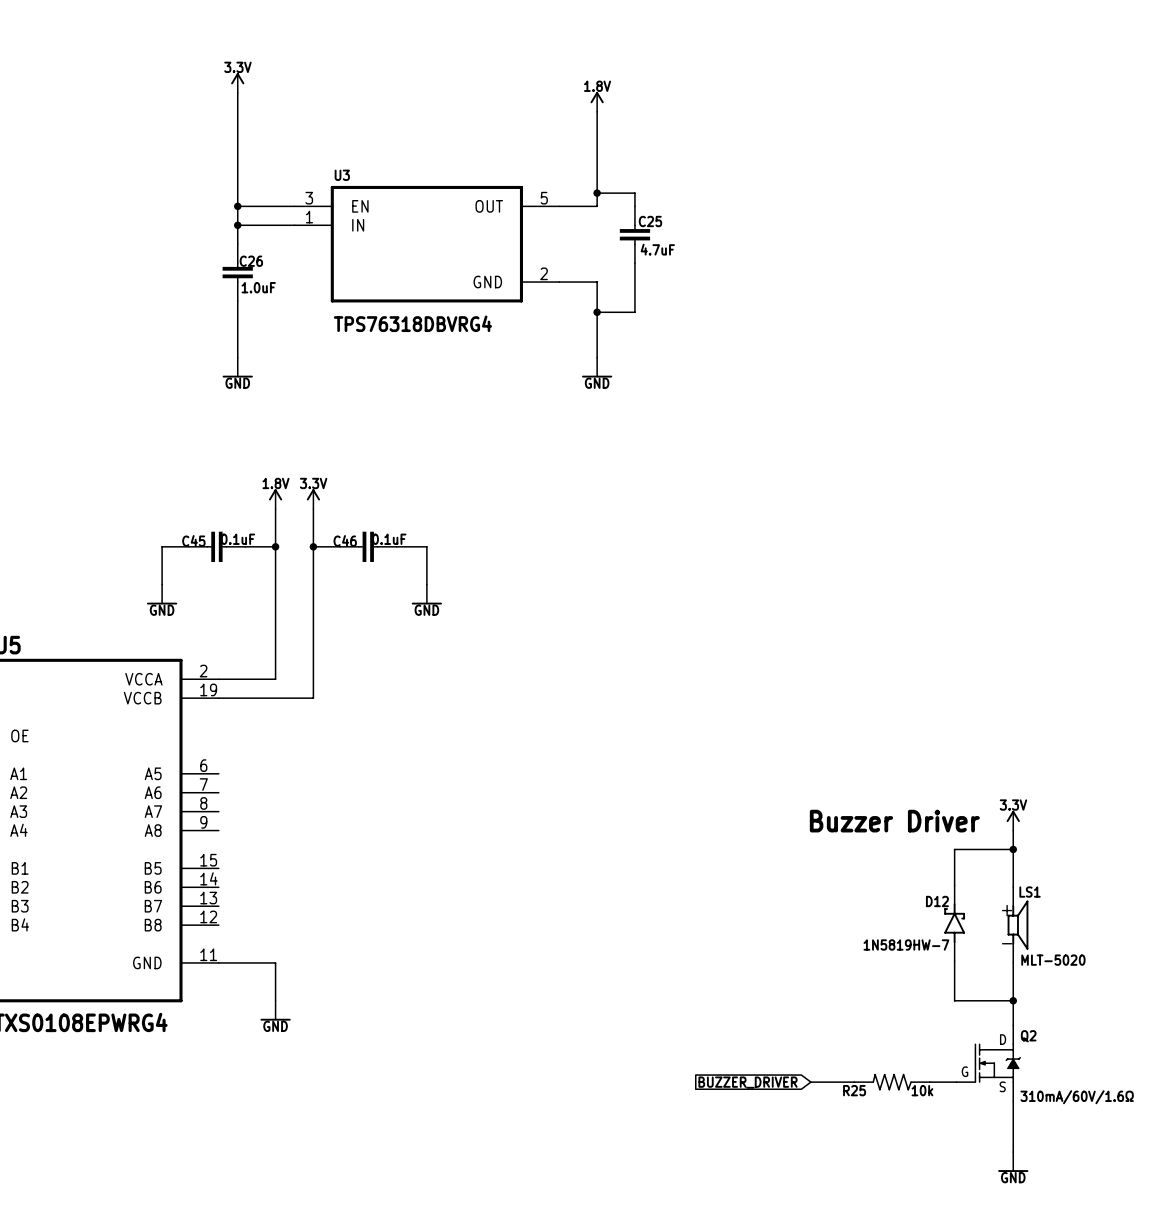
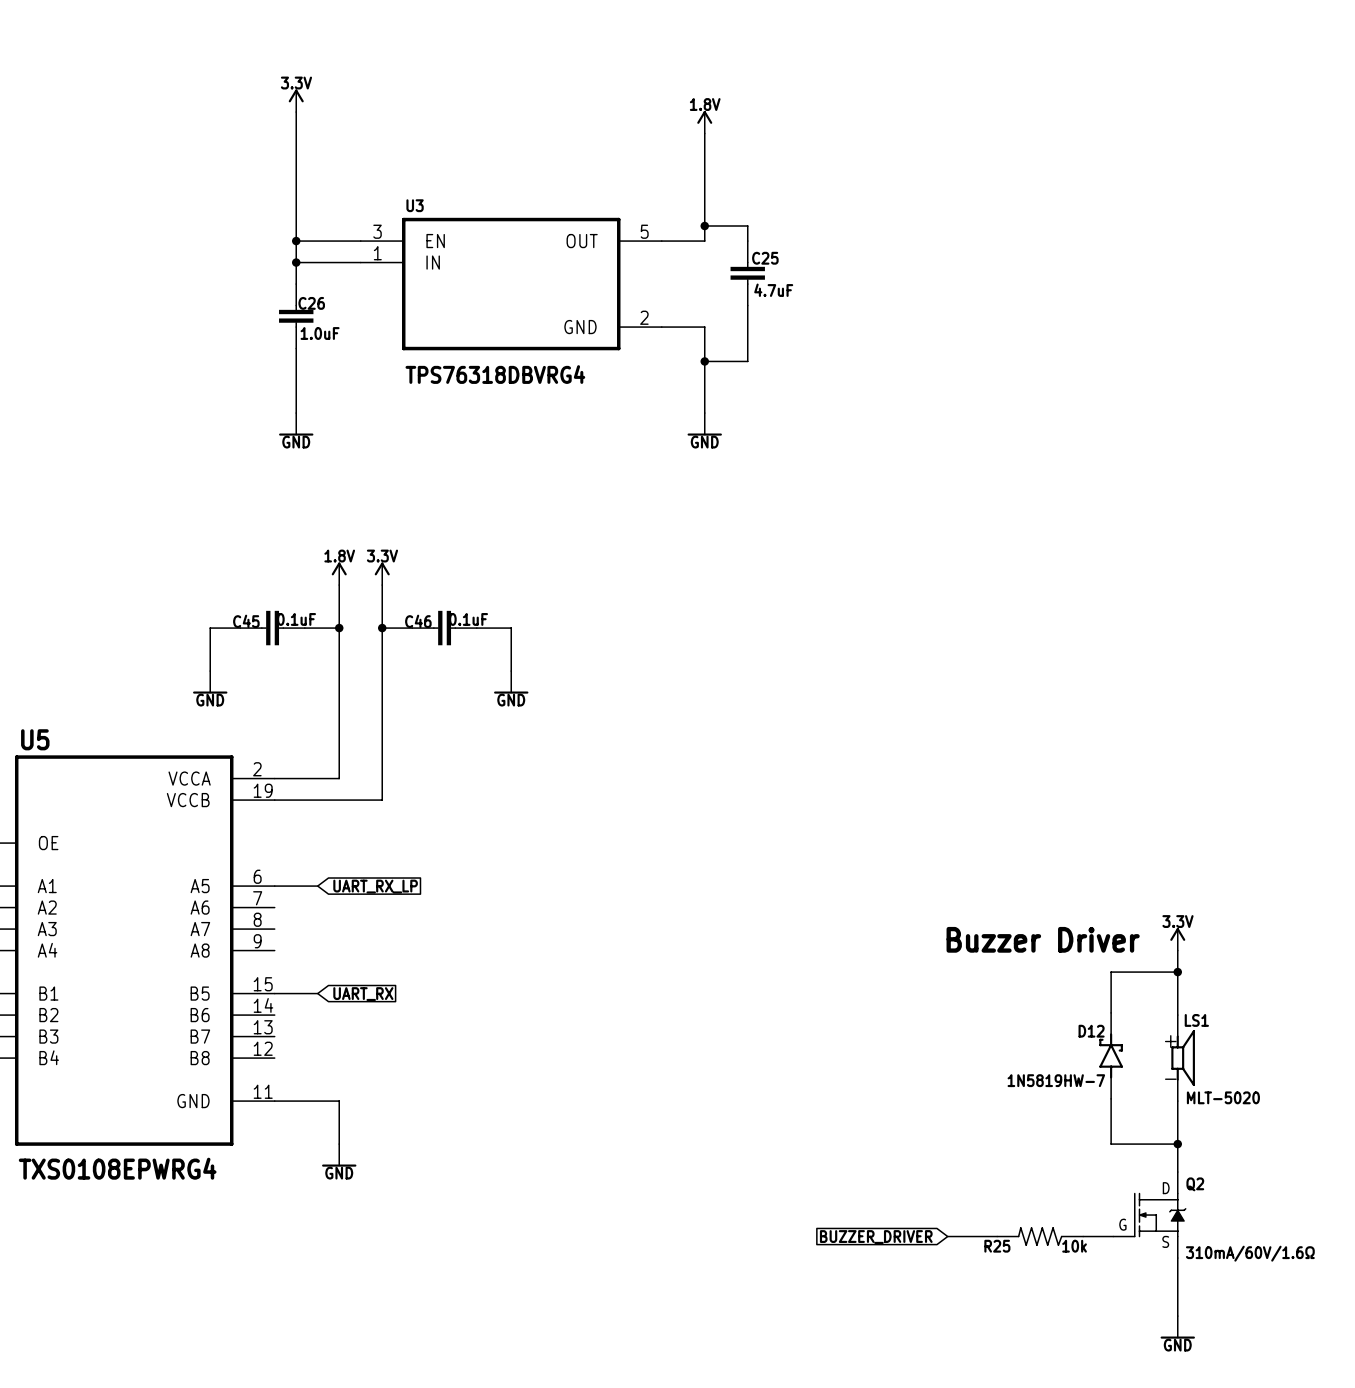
wire: none -> (274, 886) (317, 886)
global label: none -> UART_RX_LP (375, 886)
wire: none -> (274, 993) (317, 993)
global label: none -> UART_RX (363, 994)

